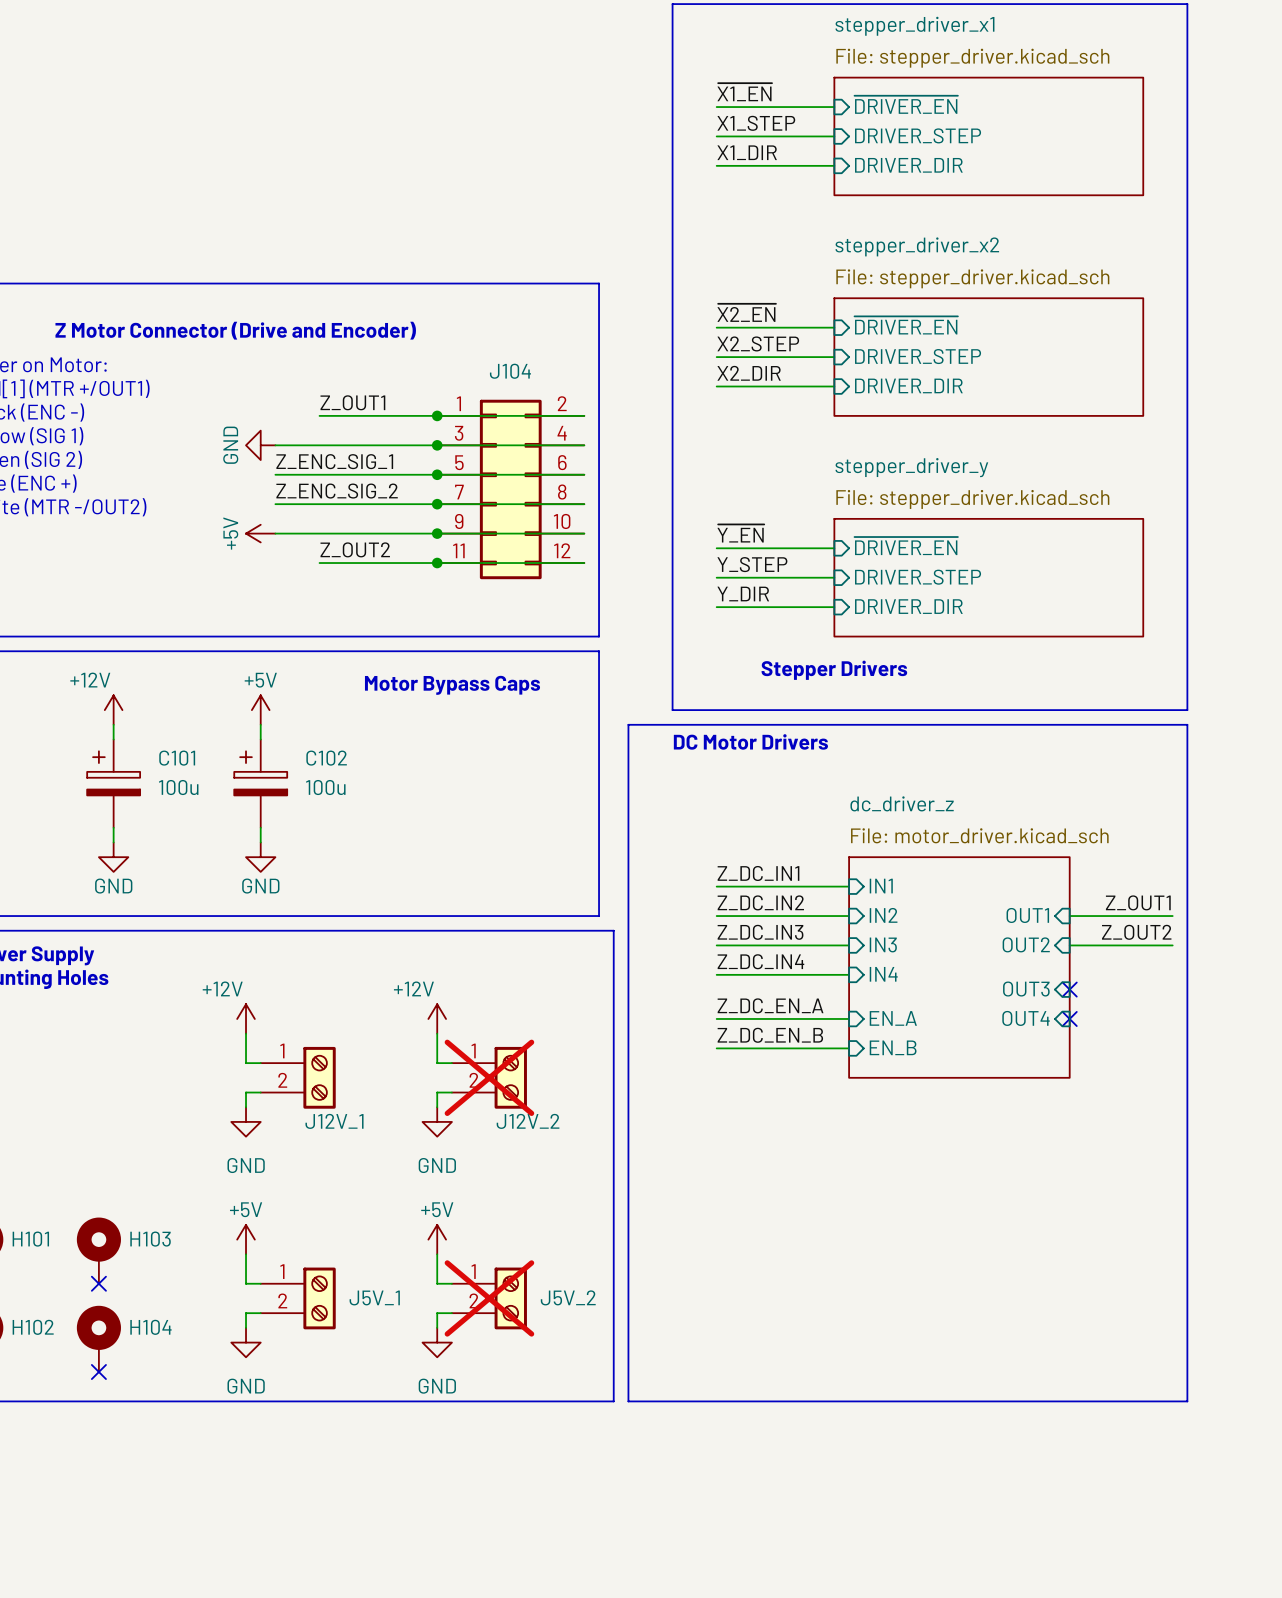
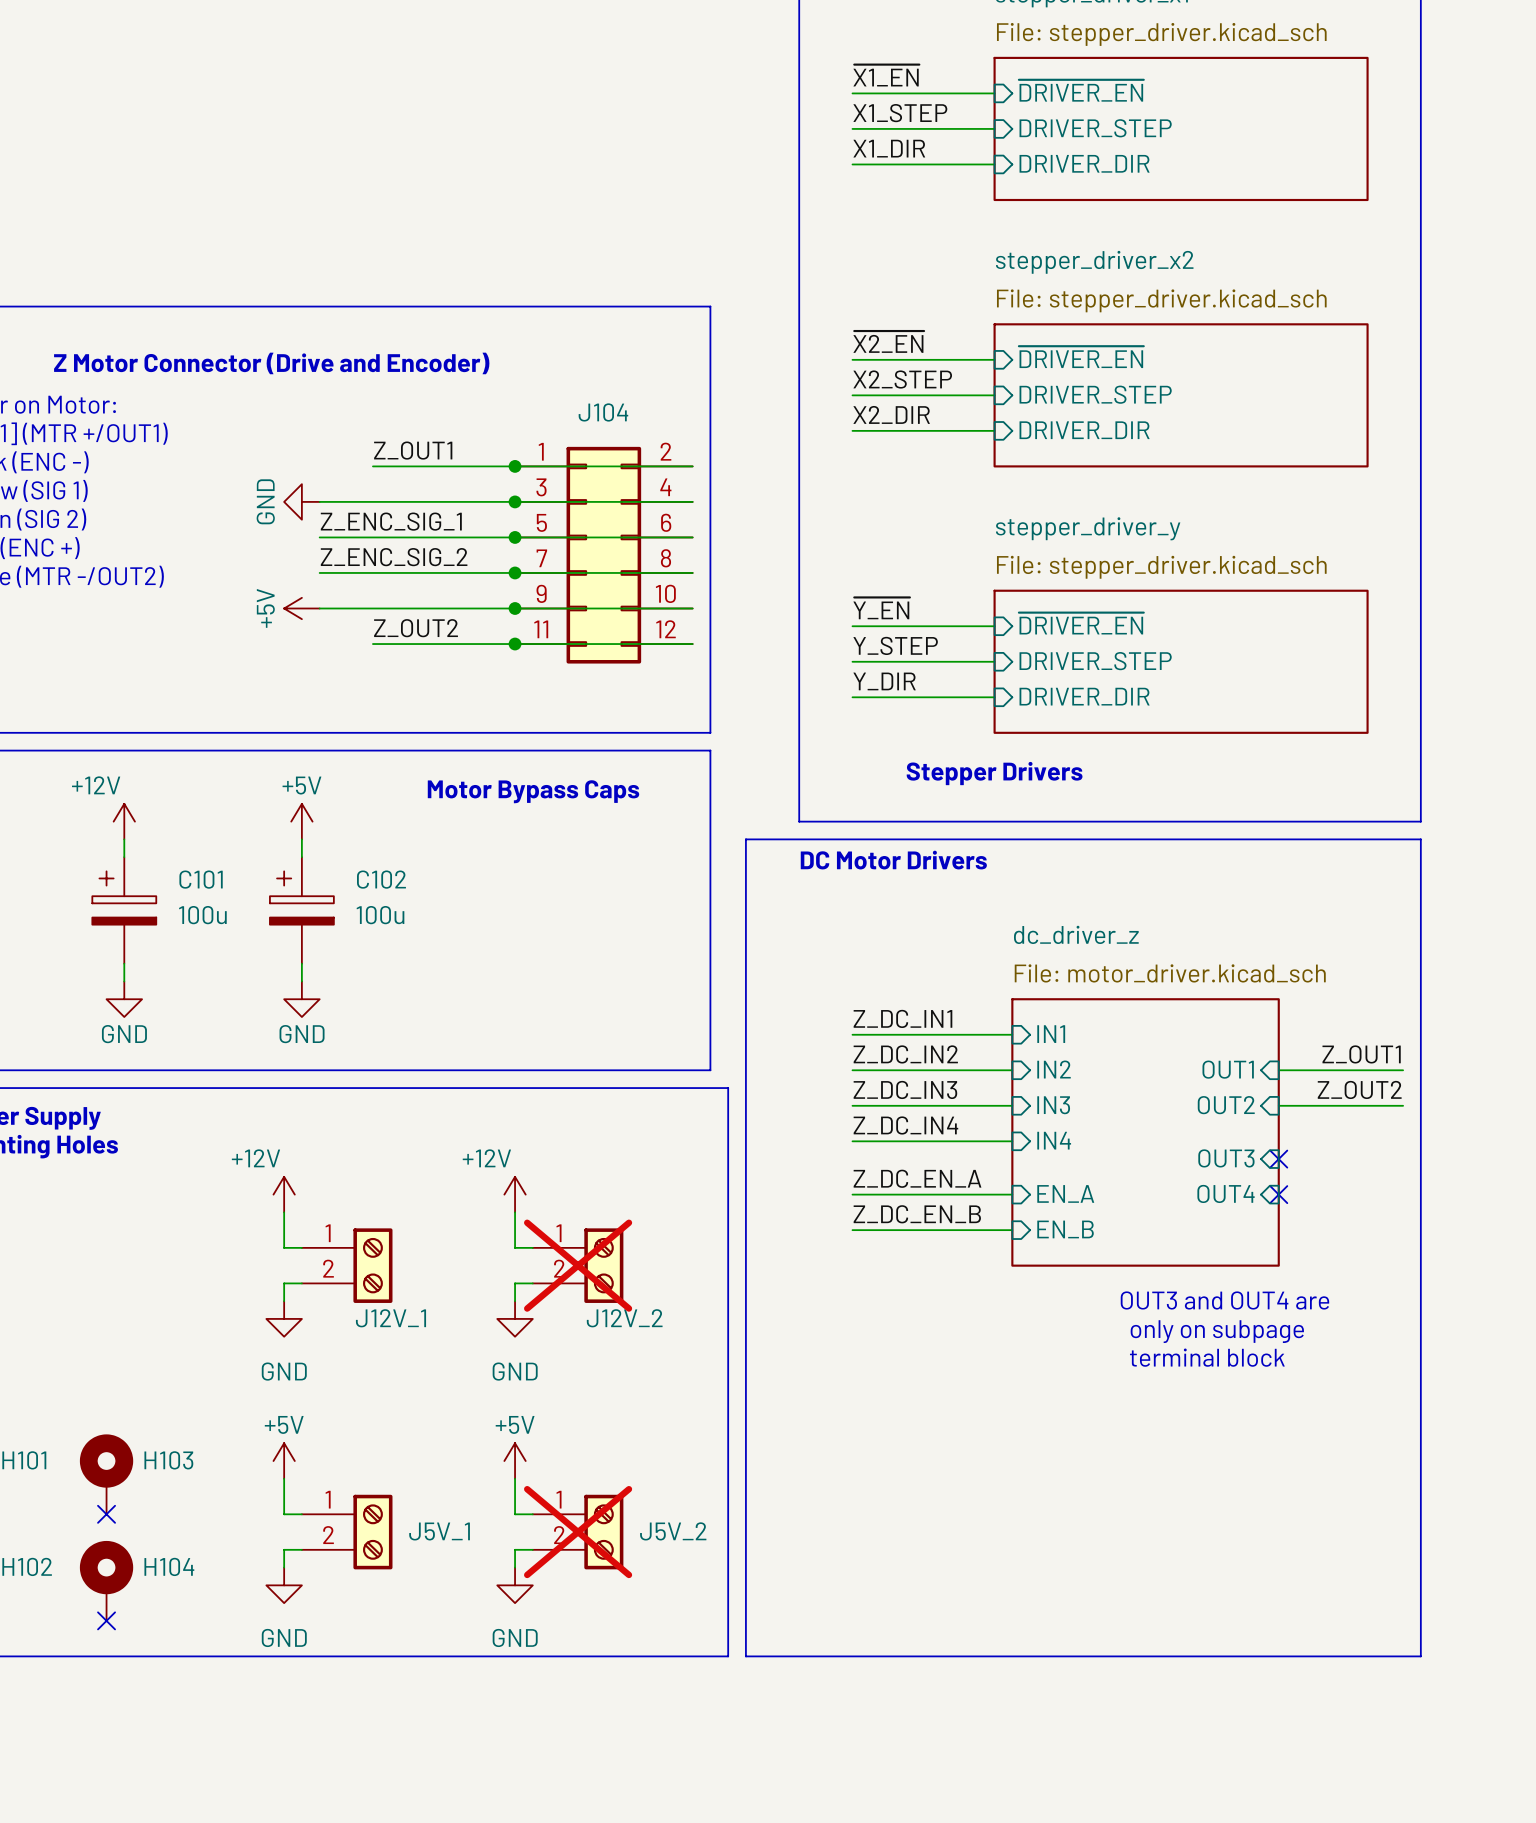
text: none -> OUT3 and OUT4 are (1224, 1300)
text: none -> only on subpage (1217, 1331)
text: none -> terminal block (1207, 1357)

